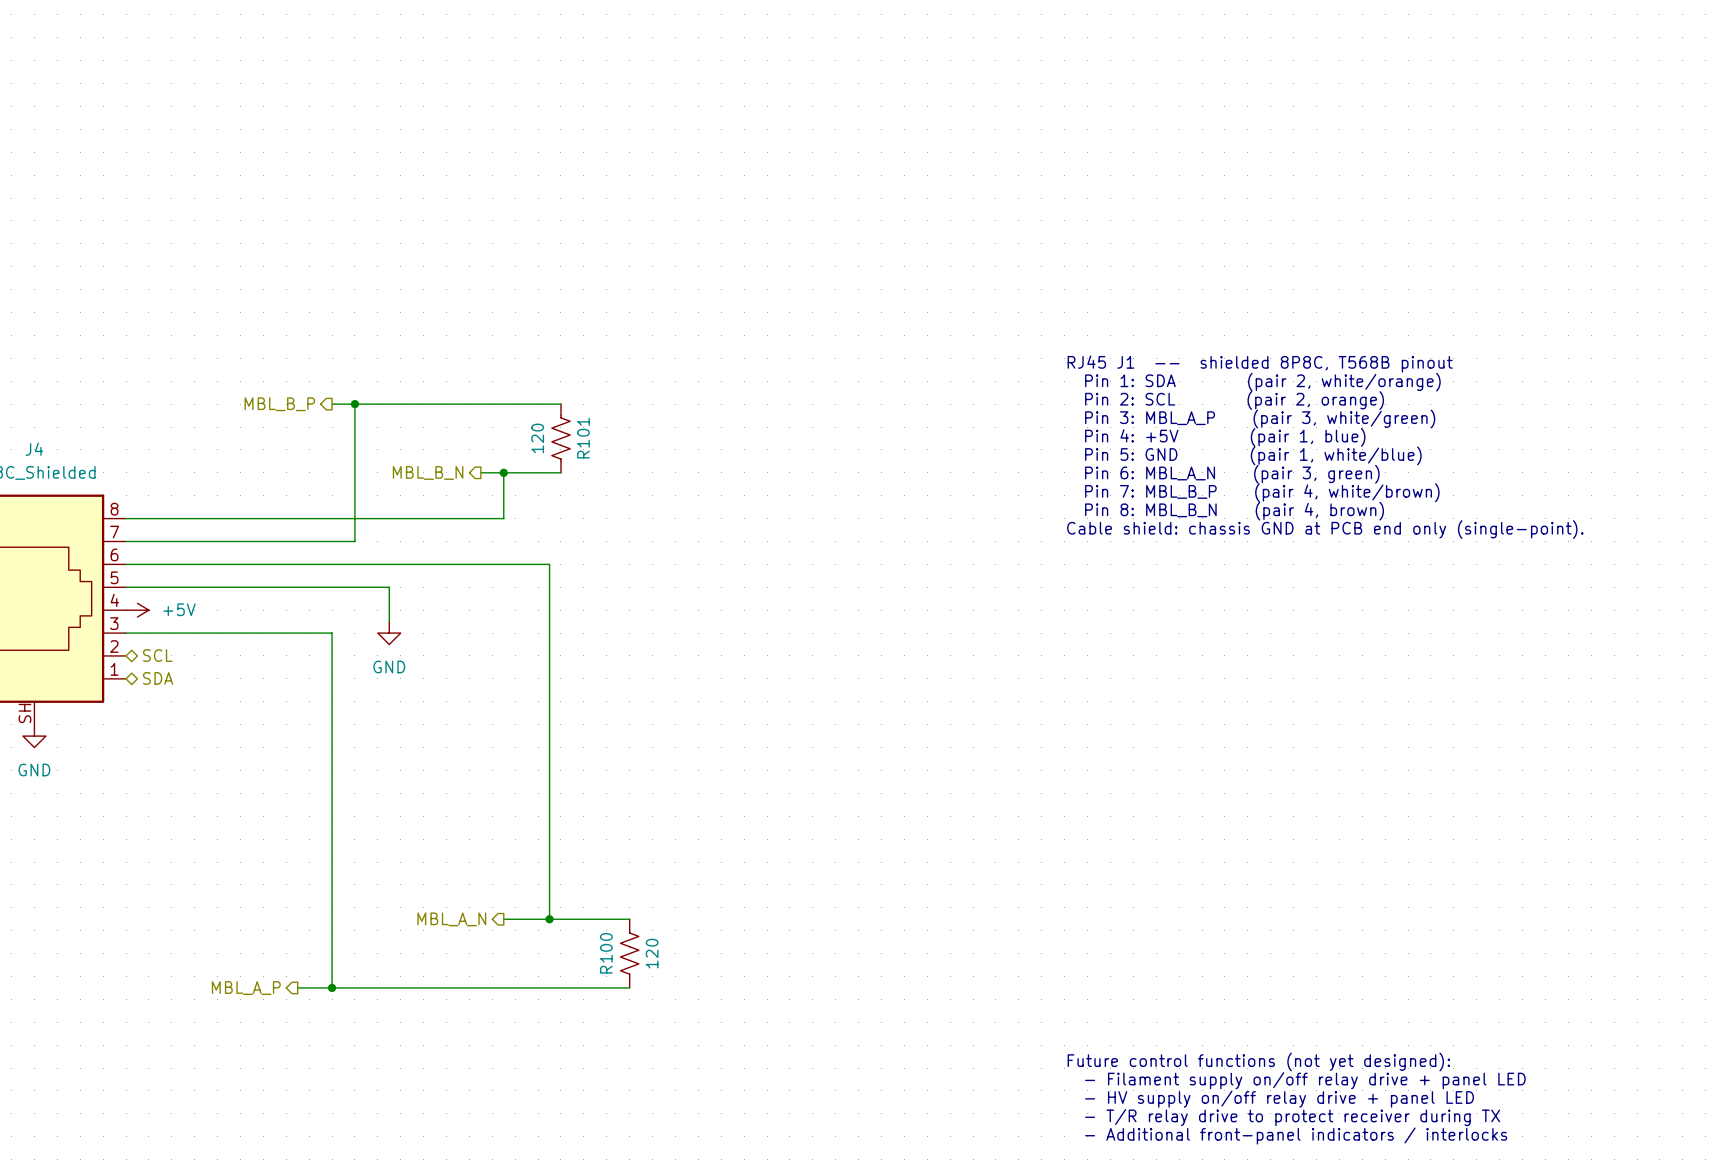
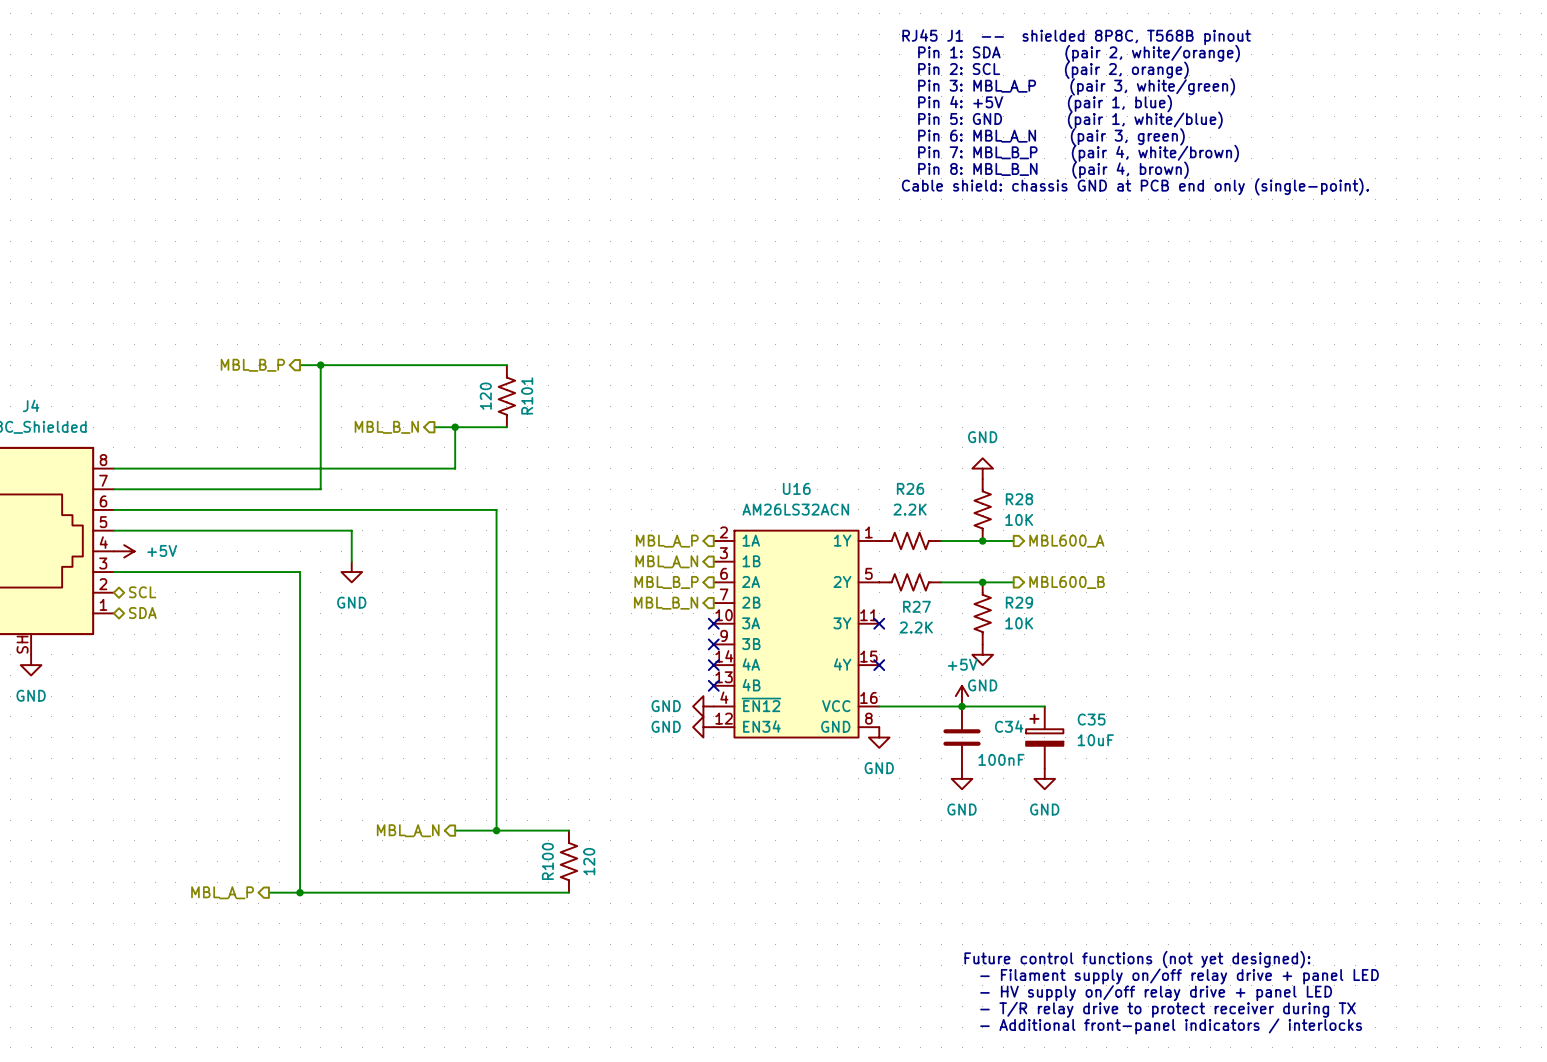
text: none -> RJ45 J1 -- shielded 8P8C, T568B pinout (1076, 37)
text: none -> Pin 1: SDA (pair 2, white/orange) (1079, 53)
text: none -> Pin 2: SCL (pair 2, orange) (1053, 70)
text: none -> Pin 3: MBL_A_P (pair 3, white/green) (1076, 86)
text: none -> Pin 4: +5V (pair 1, blue) (1045, 103)
text: none -> Pin 5: GND (pair 1, white/blue) (1070, 120)
text: none -> Pin 6: MBL_A_N (pair 3, green) (1051, 136)
text: none -> Pin 7: MBL_B_P (pair 4, white/brown) (1078, 153)
text: none -> Pin 8: MBL_B_N (pair 4, brown) (1053, 170)
text: none -> Cable shield: chassis GND at PCB end only (single-point). (1135, 186)
text: RJ45 J1 -- shielded 8P8C, T568B pinout (1260, 363) -> none
text: Pin 1: SDA (pair 2, white/orange) (1262, 382) -> none
text: Pin 2: SCL (pair 2, orange) (1234, 400) -> none
text: Pin 3: MBL_A_P (pair 3, white/green) (1260, 419) -> none
text: Pin 4: +5V (pair 1, blue) (1225, 437) -> none
text: Pin 5: GND (pair 1, white/blue) (1253, 455) -> none
text: Pin 6: MBL_A_N (pair 3, green) (1232, 474) -> none
text: Pin 7: MBL_B_P (pair 4, white/brown) (1262, 492) -> none
text: Pin 8: MBL_B_N (pair 4, brown) (1234, 511) -> none
power symbol: none -> GND (982, 468)
text: Cable shield: chassis GND at PCB end only (single-point). (1325, 529) -> none
R28: none -> 10K (982, 509)
hierarchical label: none -> MBL_A_P (667, 541)
R26: none -> 2.2K (910, 541)
wire: none -> (941, 541) (1013, 541)
junction: none -> (982, 541)
hierarchical label: none -> MBL600_A (1066, 541)
hierarchical label: none -> MBL_A_N (666, 561)
hierarchical label: none -> MBL_B_P (666, 582)
R27: none -> 2.2K (910, 582)
wire: none -> (941, 582) (1013, 582)
junction: none -> (982, 582)
hierarchical label: none -> MBL600_B (1067, 582)
hierarchical label: none -> MBL_B_N (666, 603)
R29: none -> 10K (982, 613)
no-connect mark: none -> (713, 623)
no-connect mark: none -> (879, 623)
U16: none -> AM26LS32ACN (796, 634)
no-connect mark: none -> (713, 644)
power symbol: none -> GND (982, 654)
no-connect mark: none -> (713, 665)
no-connect mark: none -> (879, 665)
no-connect mark: none -> (713, 685)
power symbol: none -> +5V (962, 696)
power symbol: none -> GND (703, 706)
wire: none -> (879, 706) (1044, 706)
junction: none -> (962, 706)
power symbol: none -> GND (703, 727)
power symbol: none -> GND (879, 737)
C34: none -> 100nF (962, 737)
C35: none -> 10uF (1044, 737)
power symbol: none -> GND (962, 778)
power symbol: none -> GND (1044, 778)

